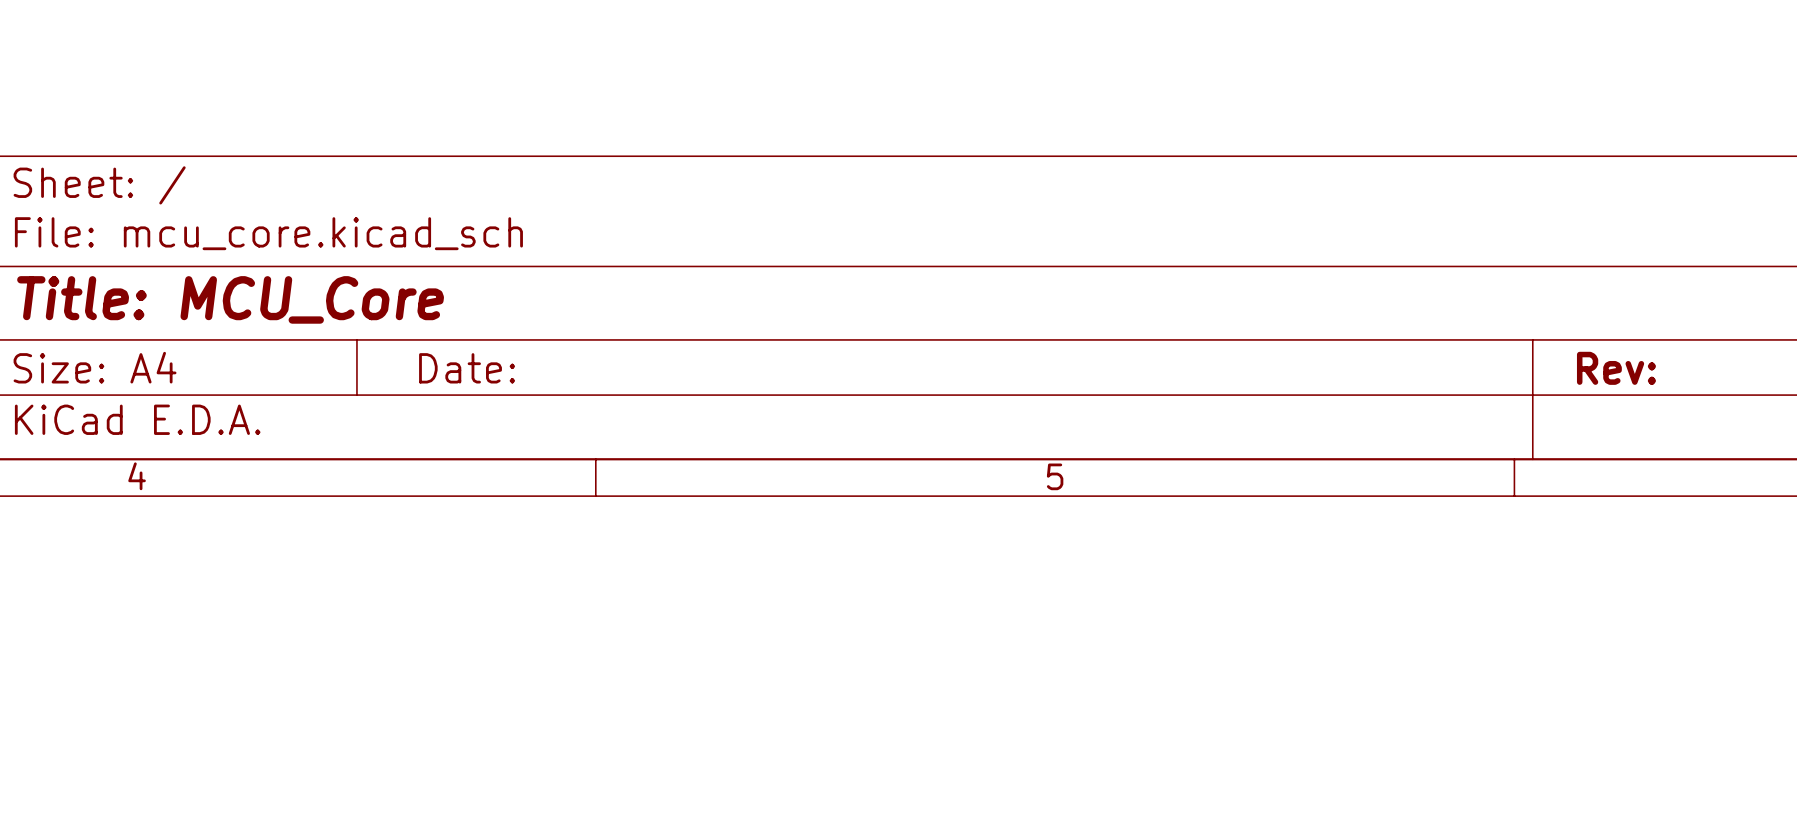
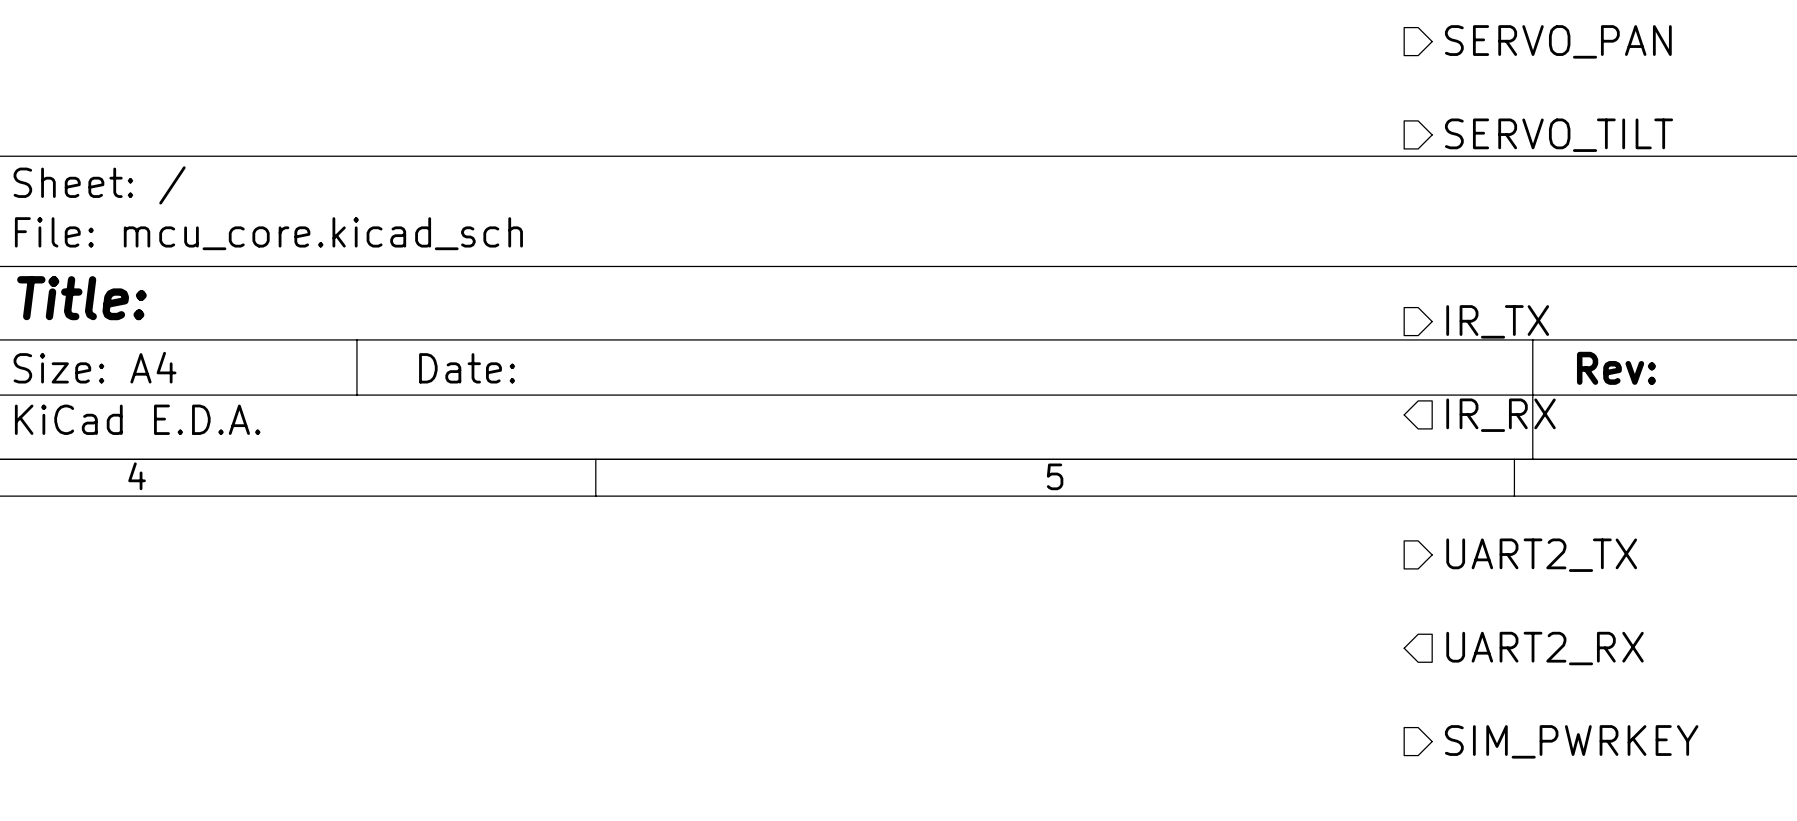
hierarchical label: none -> SERVO_PAN (1558, 41)
hierarchical label: none -> SERVO_TILT (1559, 135)
title block: Title: MCU_Core (230, 299) -> Title: (81, 298)
hierarchical label: none -> IR_TX (1497, 321)
hierarchical label: none -> IR_RX (1501, 415)
hierarchical label: none -> UART2_TX (1541, 555)
hierarchical label: none -> UART2_RX (1545, 648)
hierarchical label: none -> SIM_PWRKEY (1571, 741)

